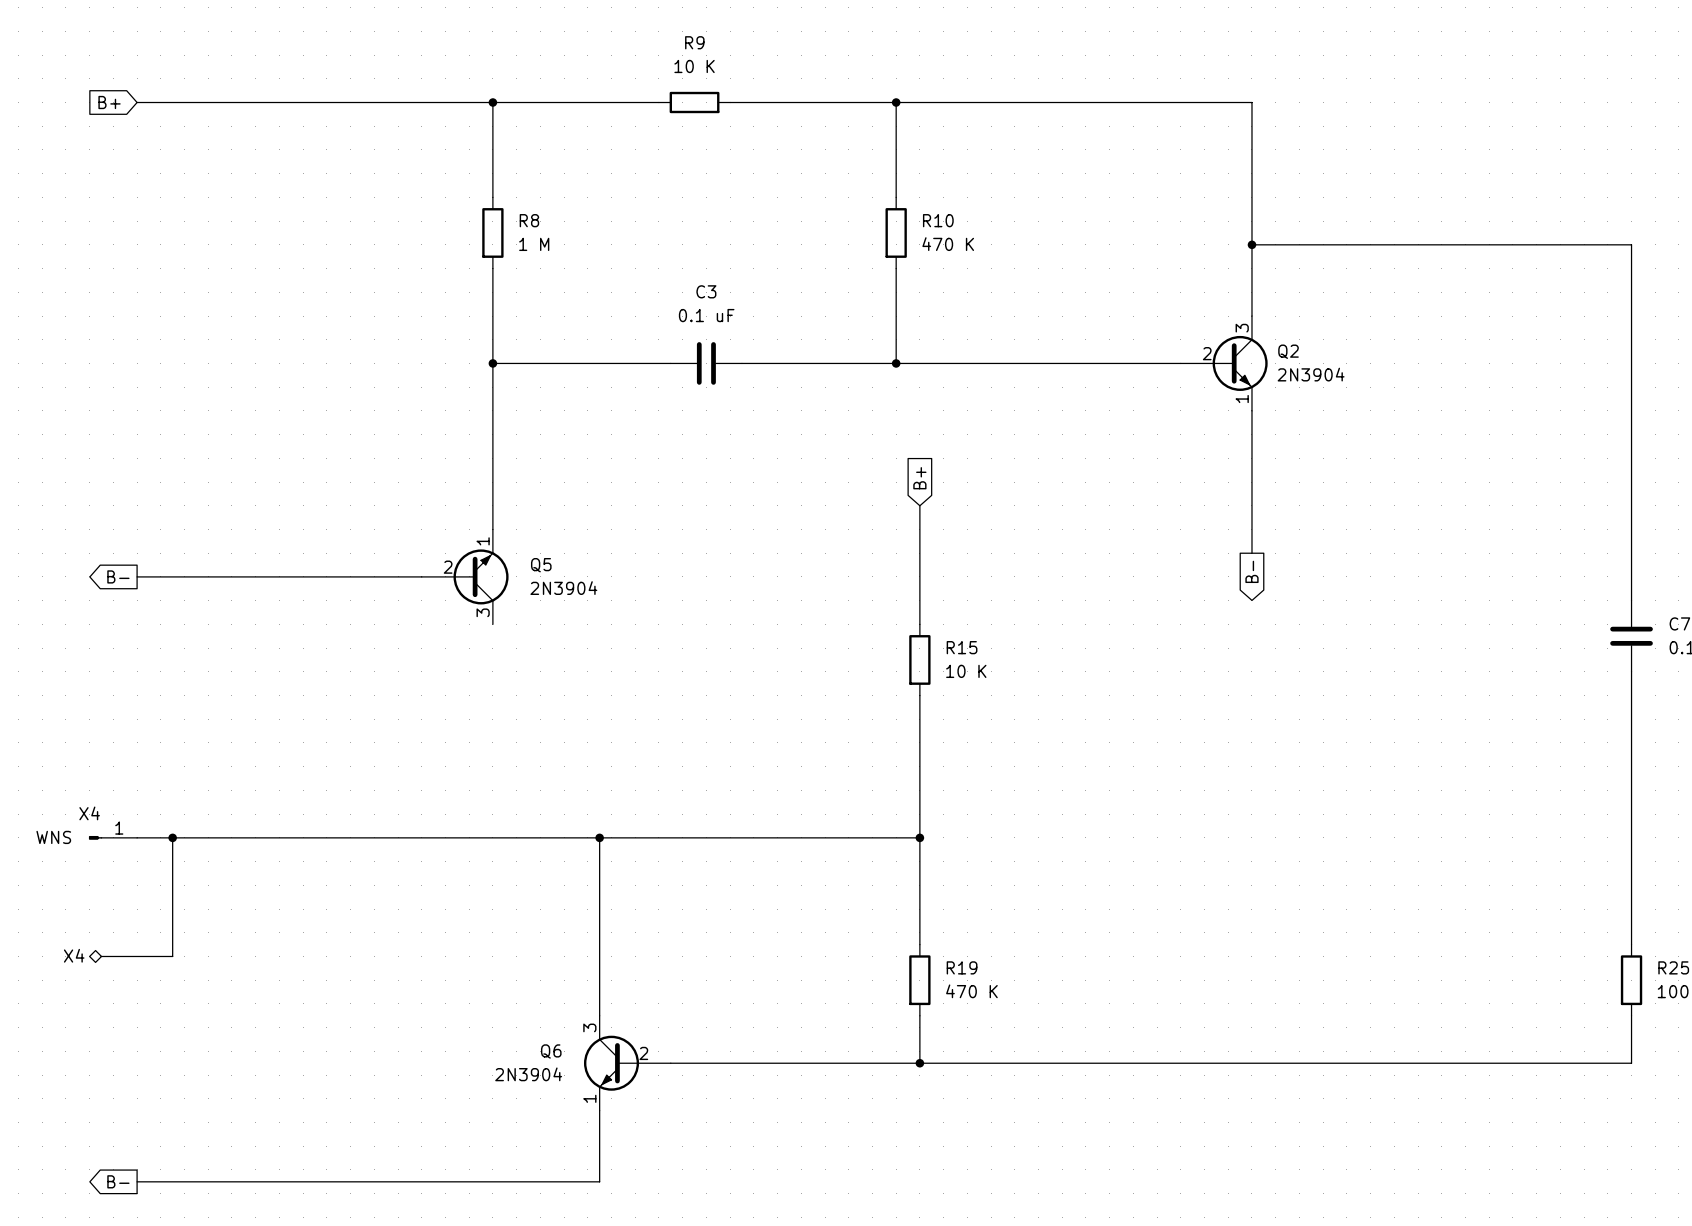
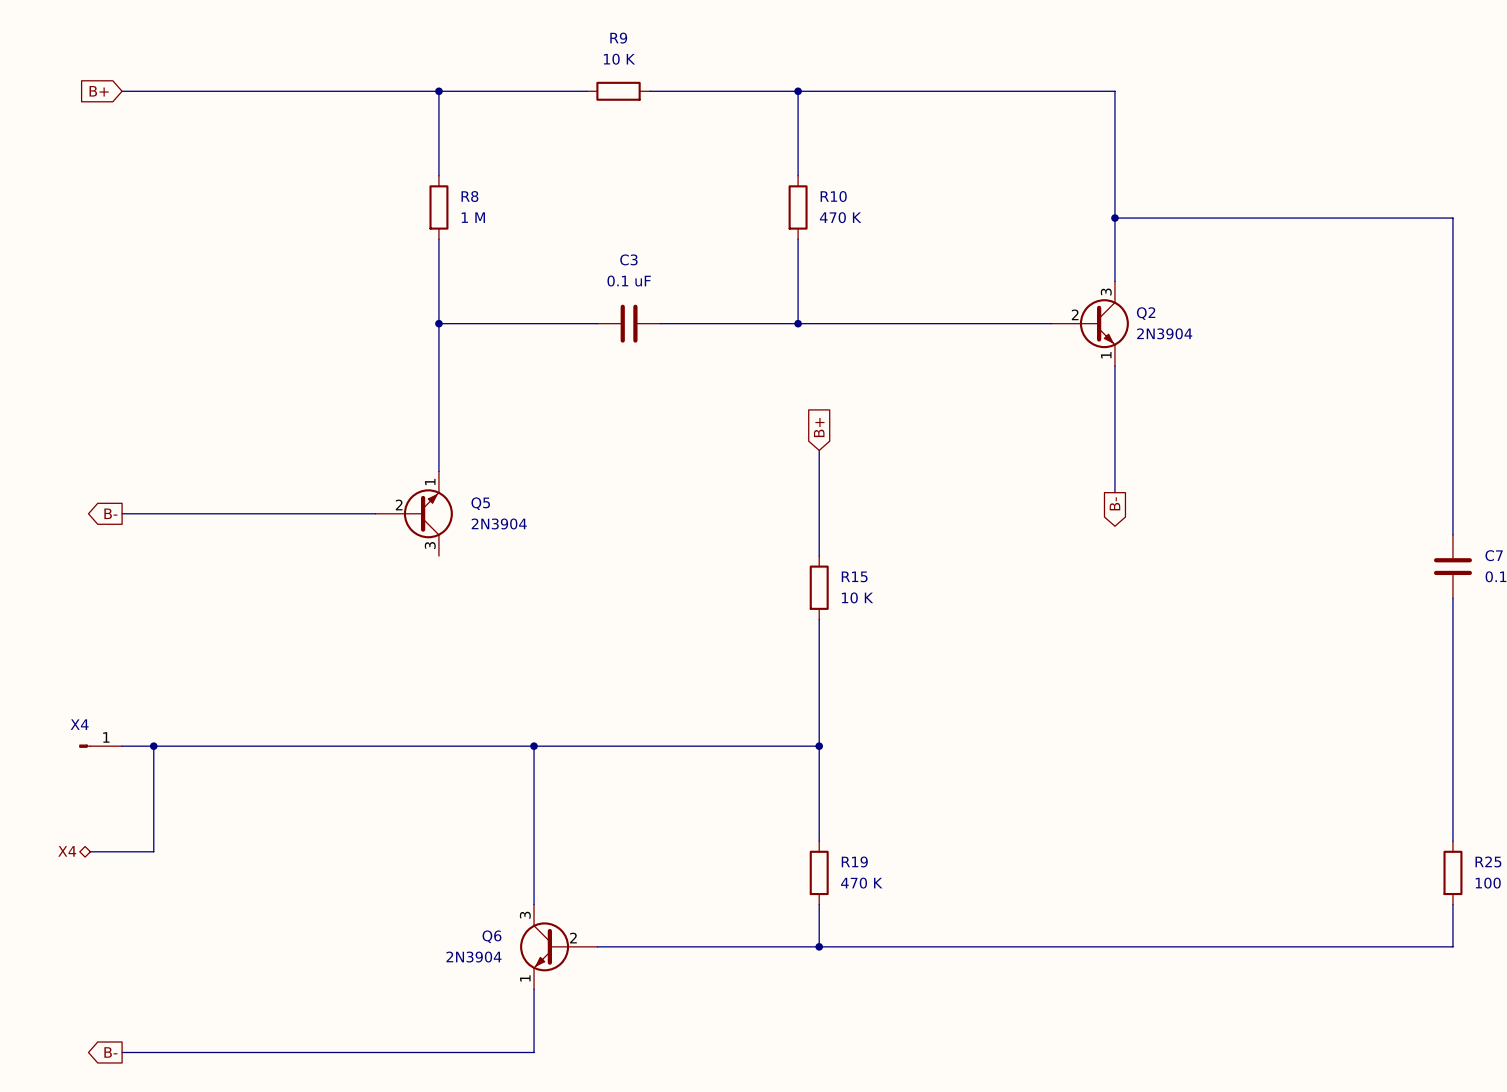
X4 value: WNS (53, 837) -> none

